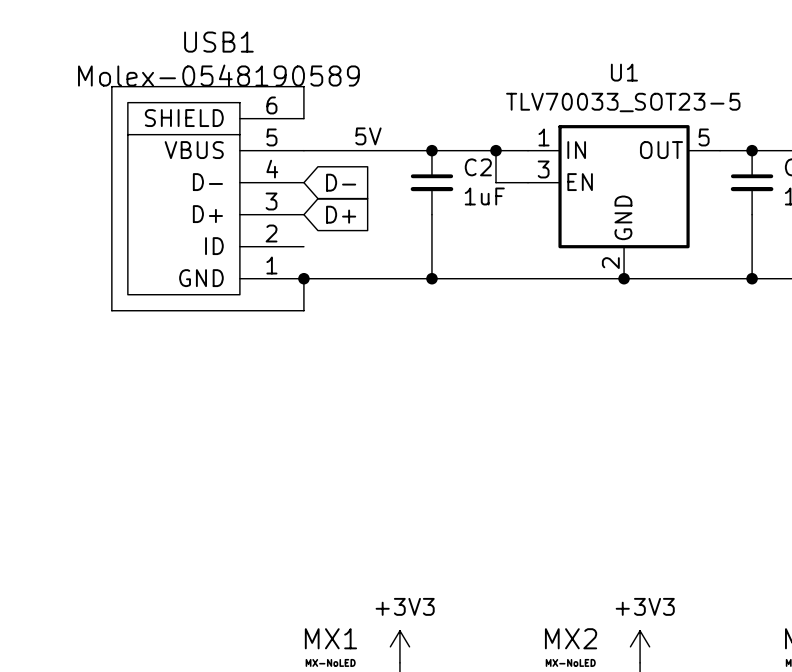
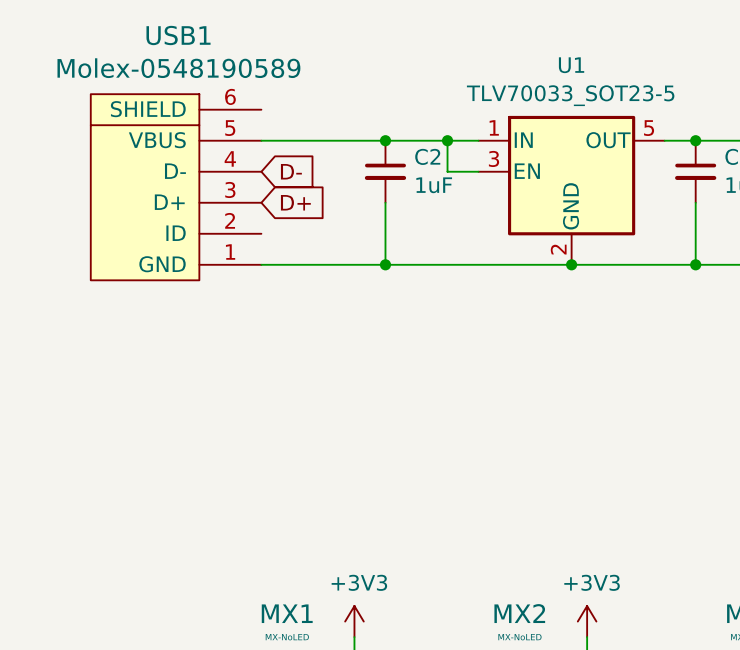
wire: (303, 118) (303, 86) (111, 86) (111, 310) (303, 310) (303, 278) -> none
label: 5V (368, 136) -> none
junction: (303, 278) -> none

